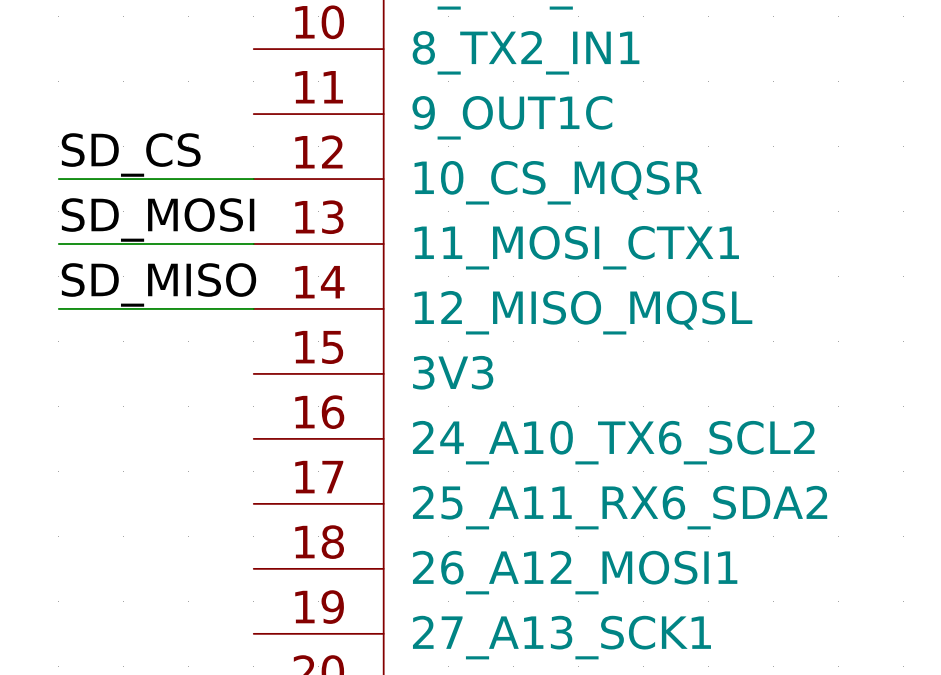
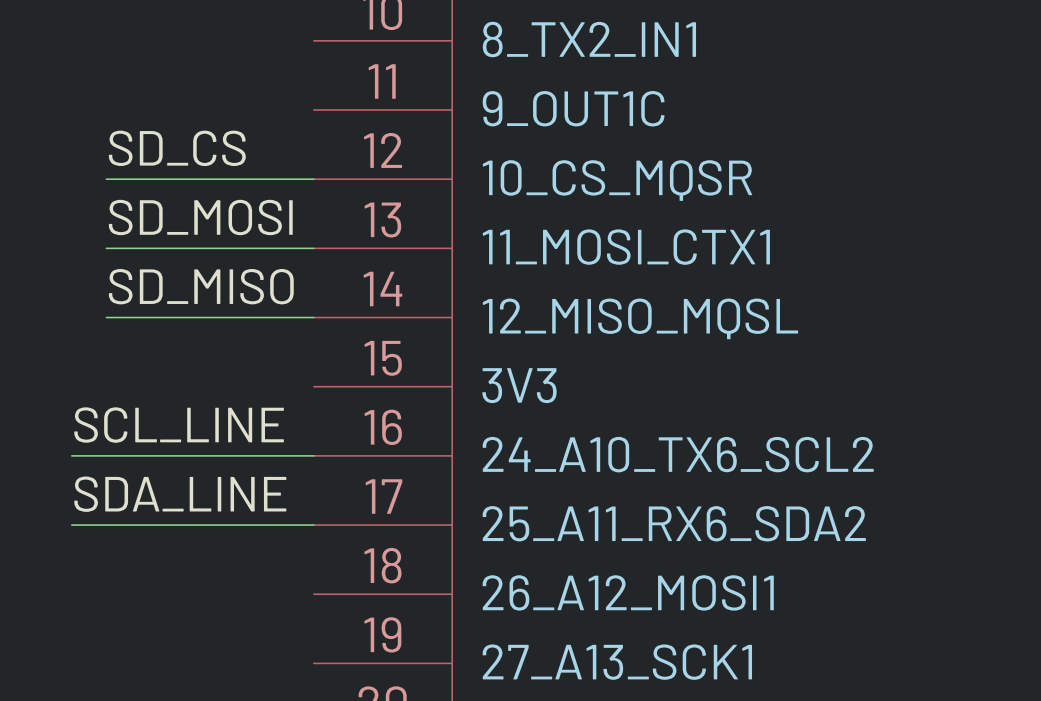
label: none -> SCL_LINE (179, 425)
wire: none -> (71, 455) (313, 455)
label: none -> SDA_LINE (180, 494)
wire: none -> (71, 525) (313, 525)

